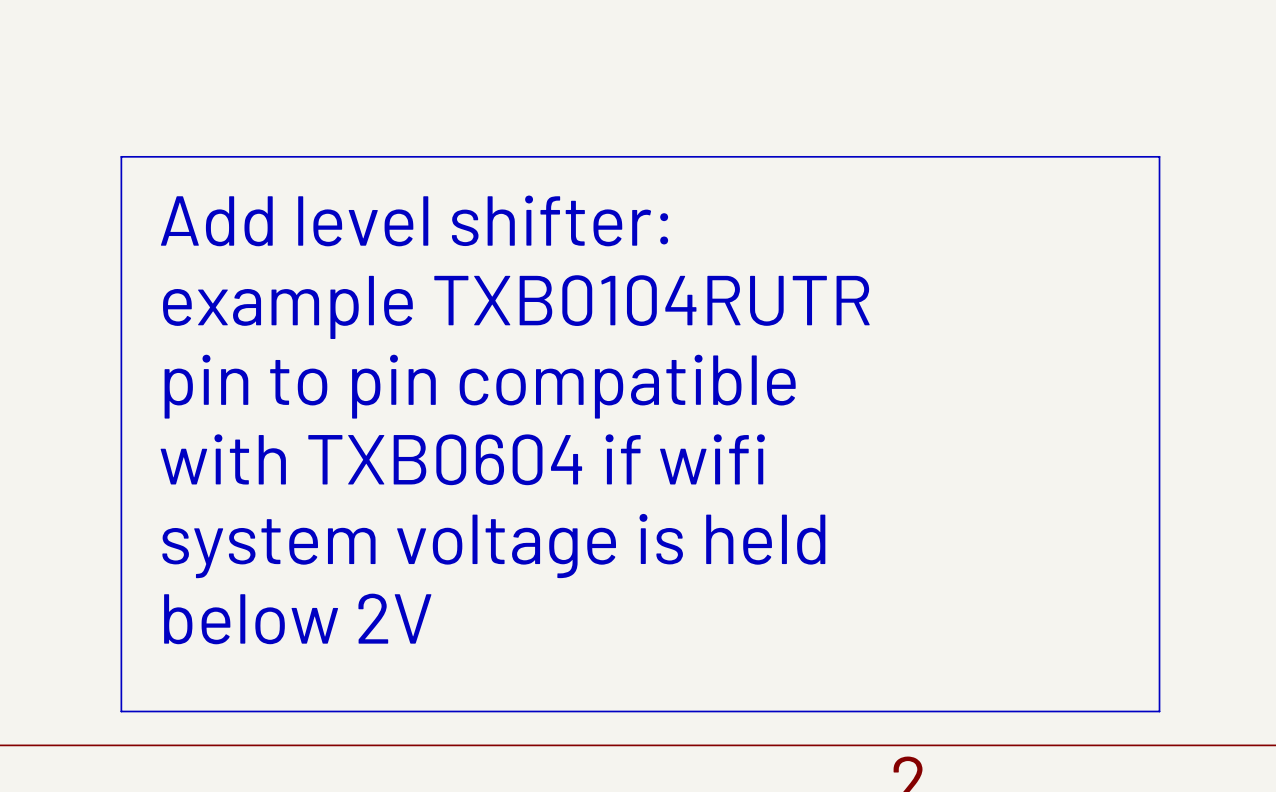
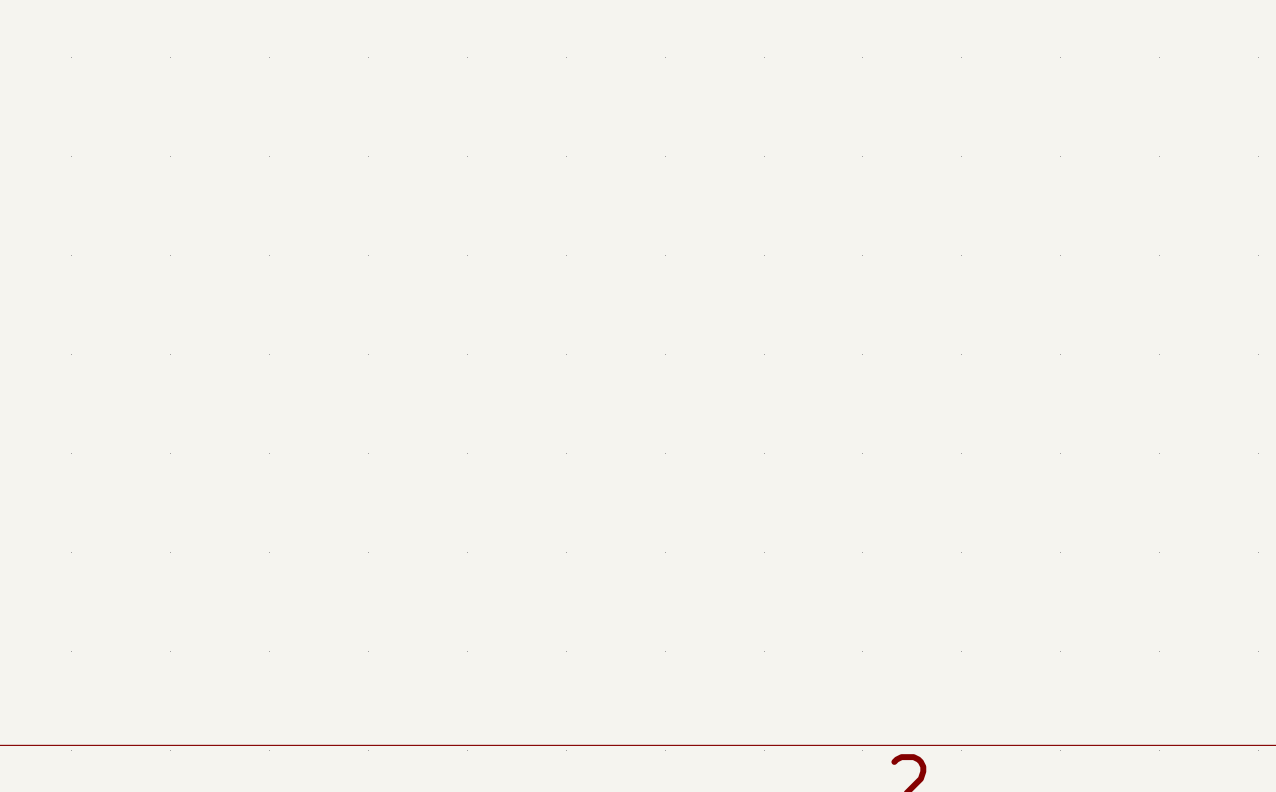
line: (121, 156) (1159, 156) (1159, 711) (121, 711) (121, 156) -> none
text: Add level shifter: (414, 220) -> none
text: example TXB0104RUTR (516, 307) -> none
text: pin to pin compatible (480, 386) -> none
text: with TXB0604 if wifi (462, 459) -> none
text: system voltage is held (493, 546) -> none
text: below 2V (297, 618) -> none

